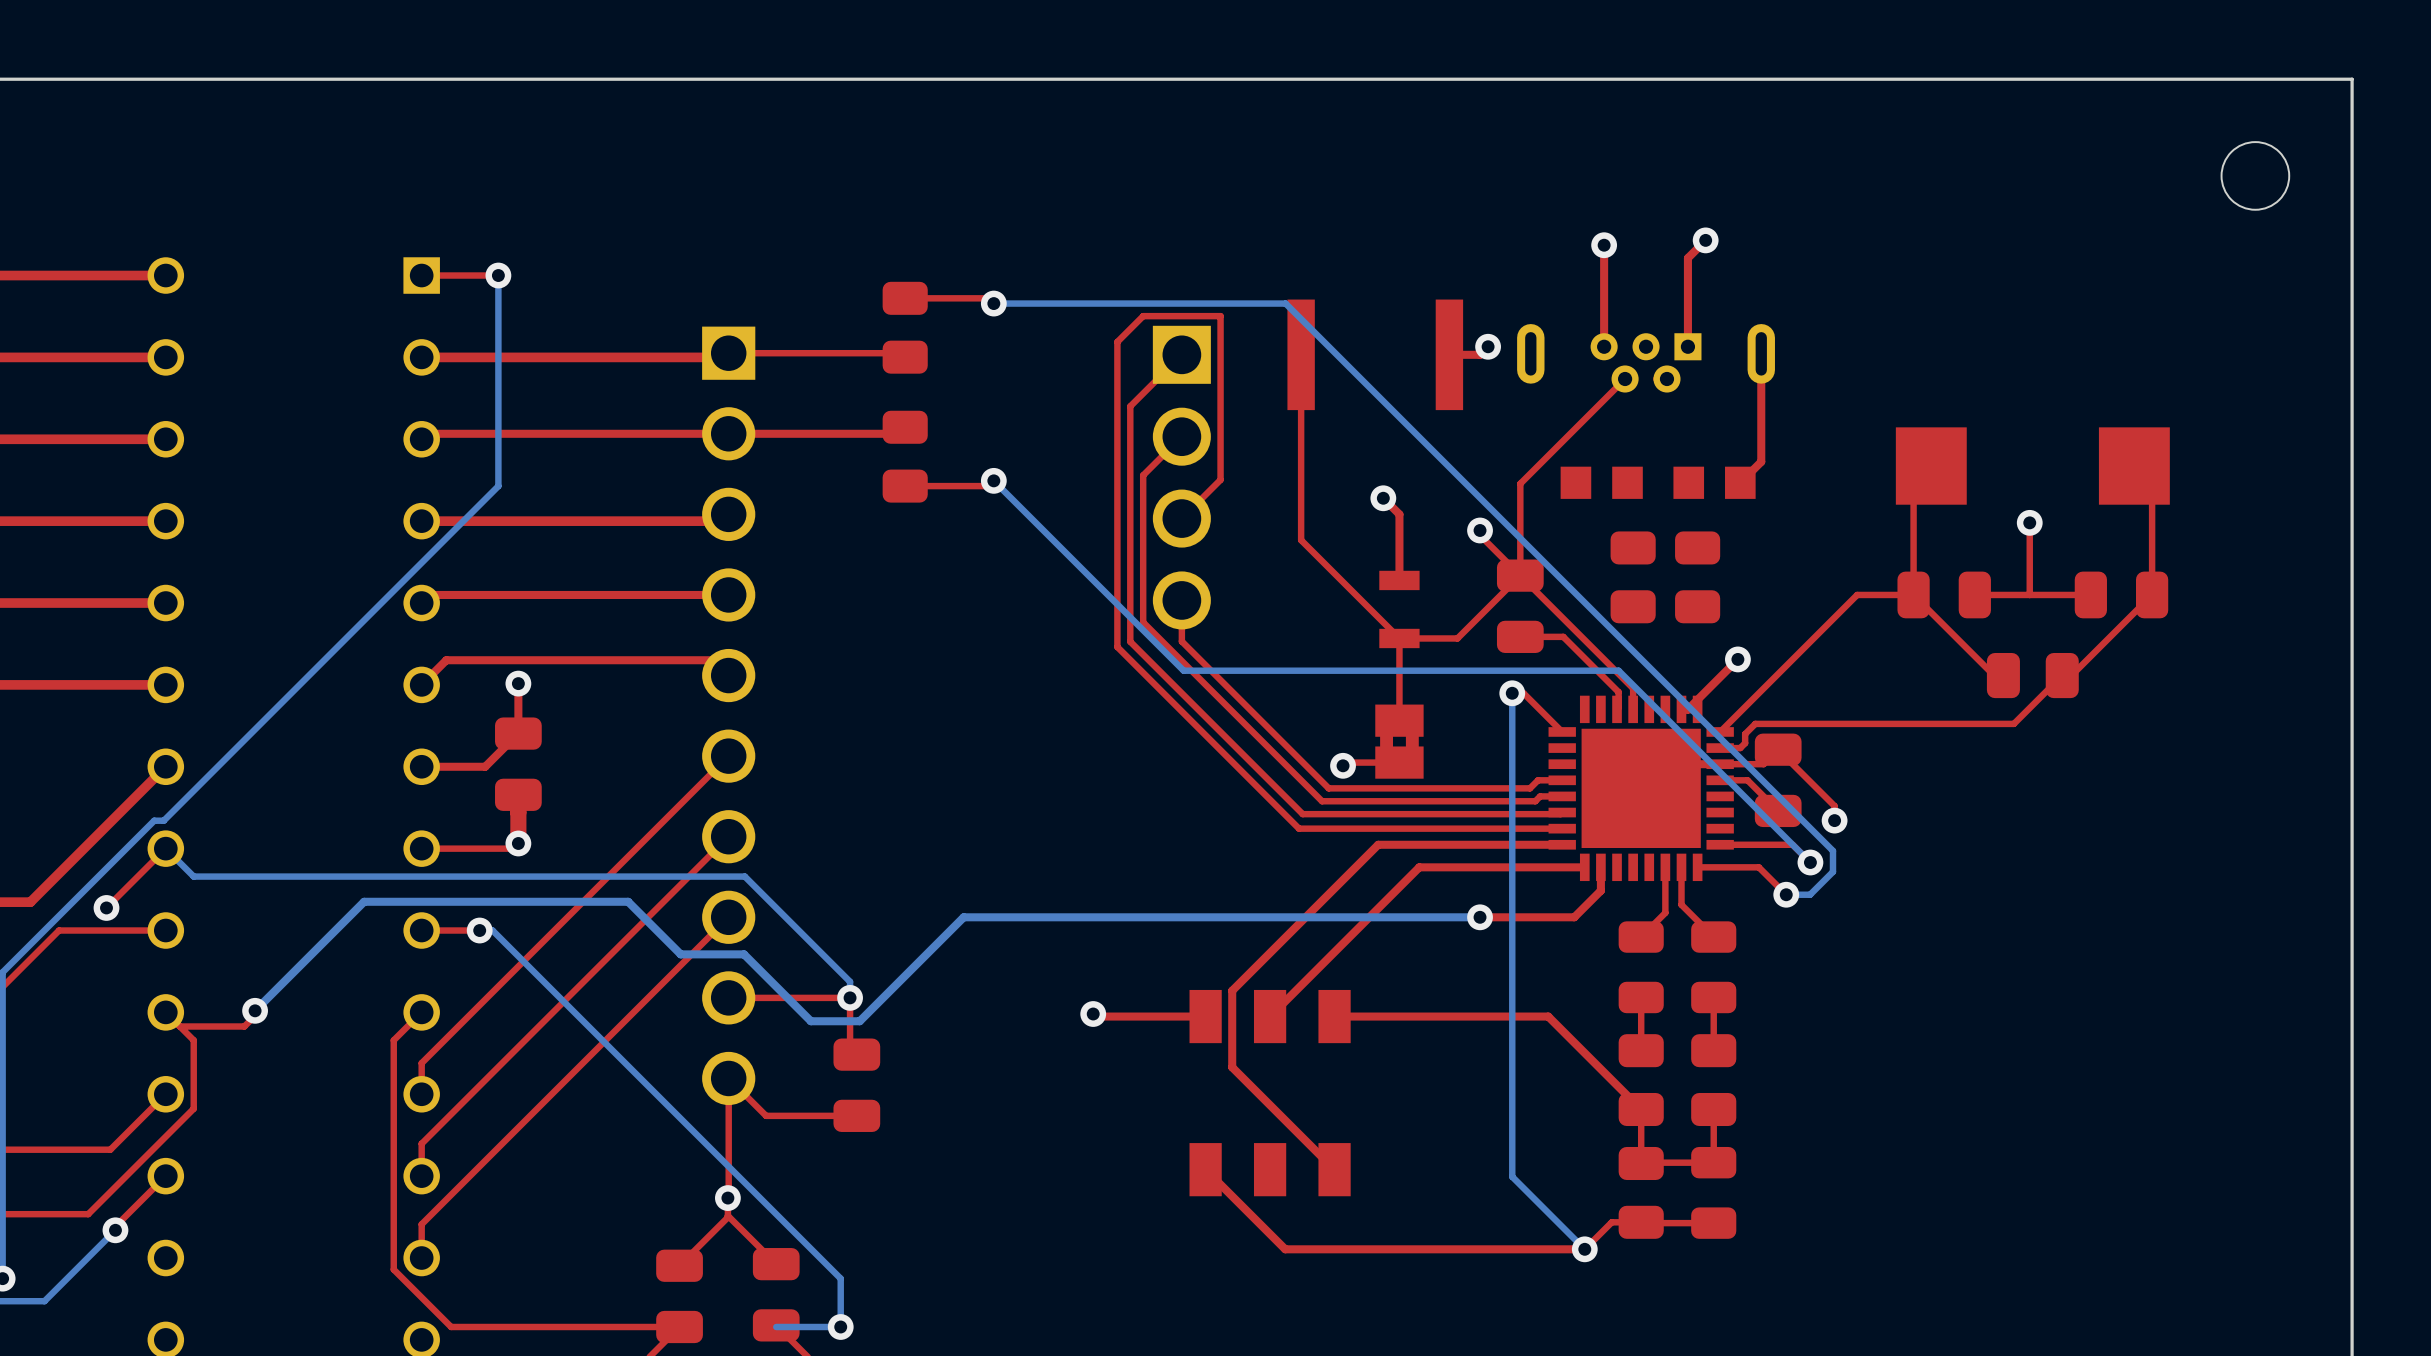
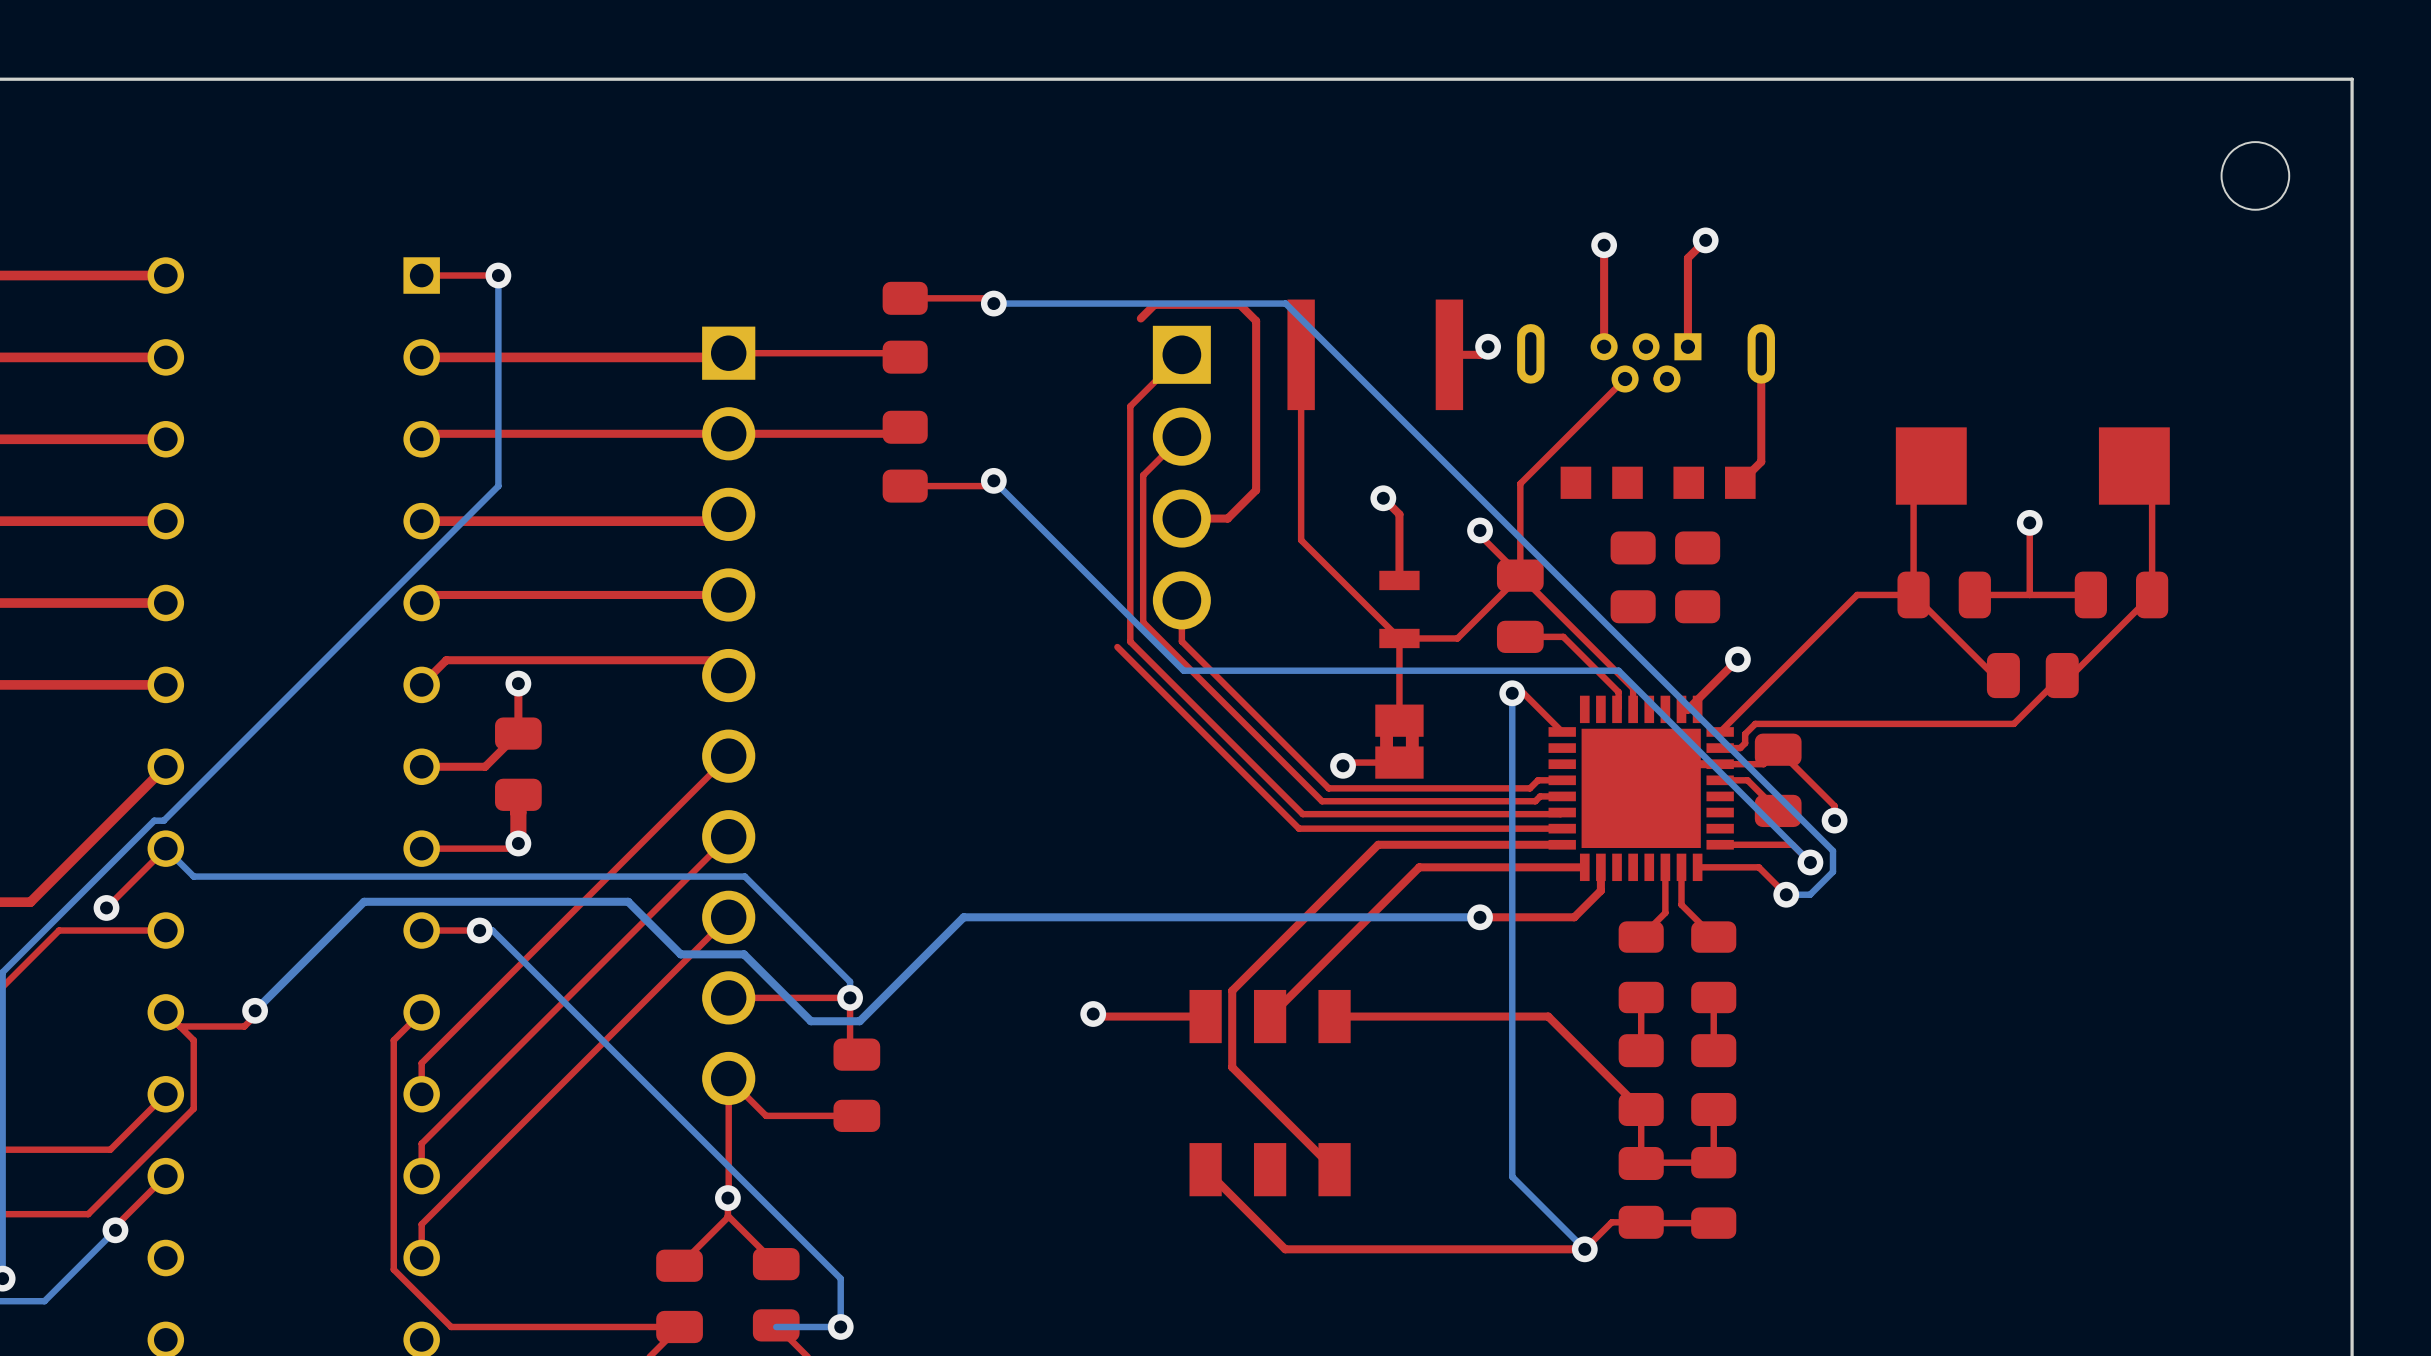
top track: (1143, 316) (1220, 316) (1220, 479) (1181, 518) -> (1140, 318) (1154, 304) (1240, 304) (1256, 320) (1256, 490) (1227, 518) (1181, 518)
top track: (1140, 318) (1117, 341) (1117, 647) -> none

